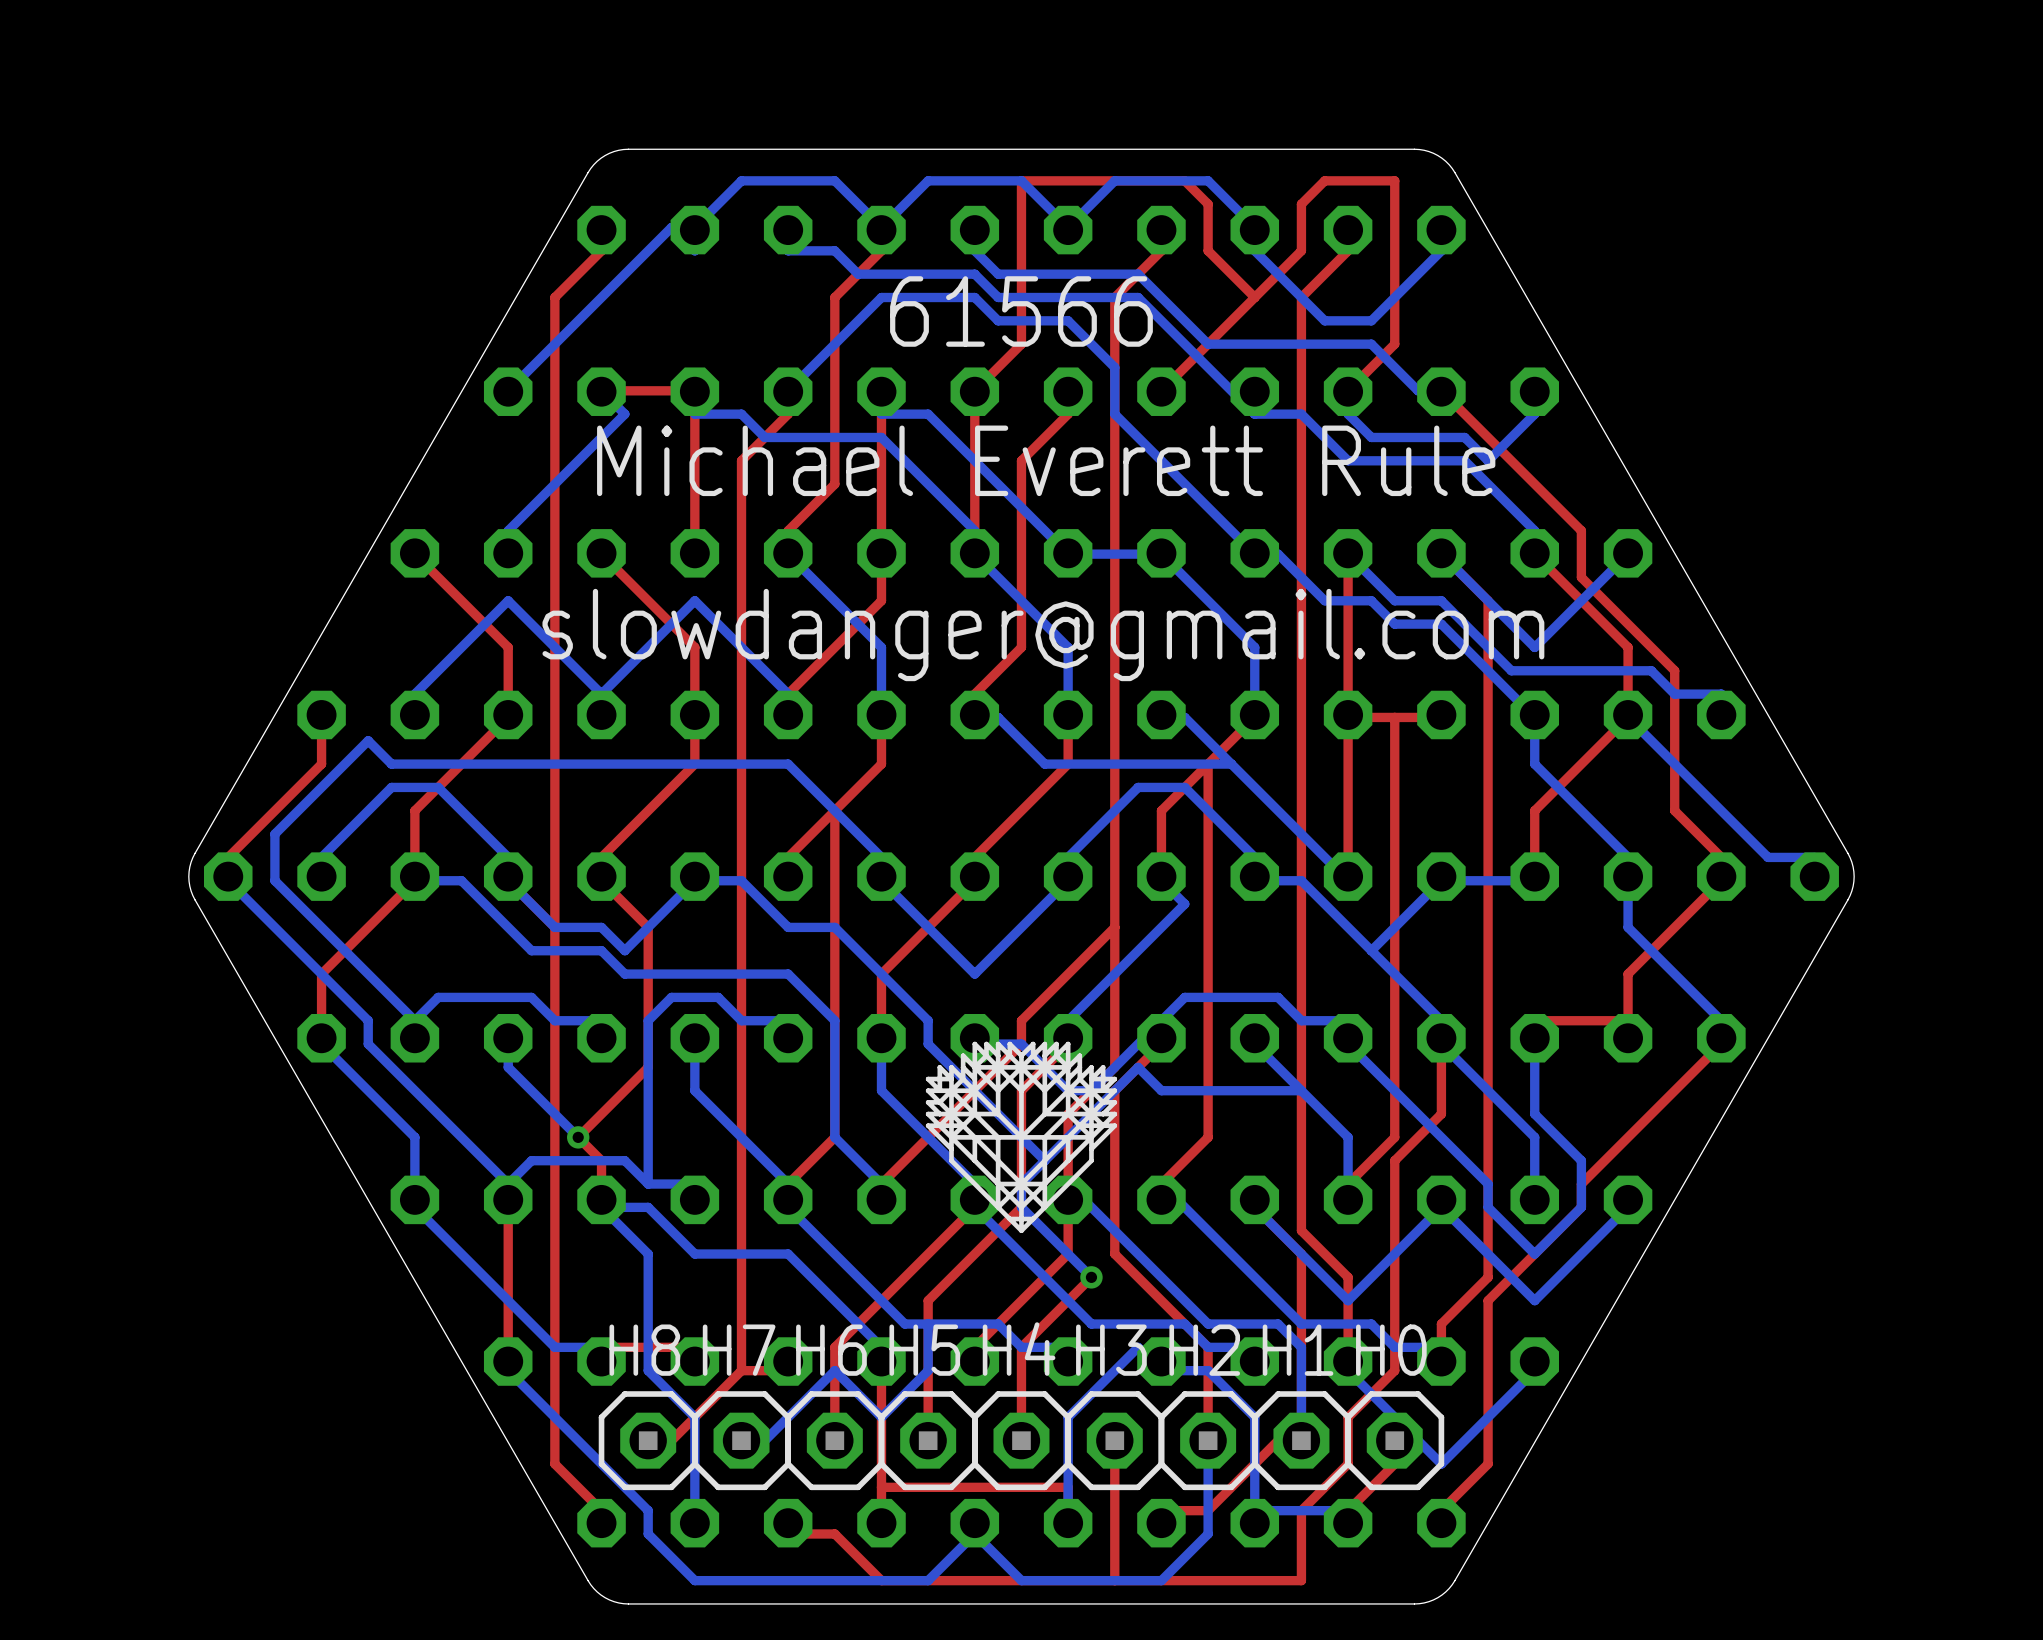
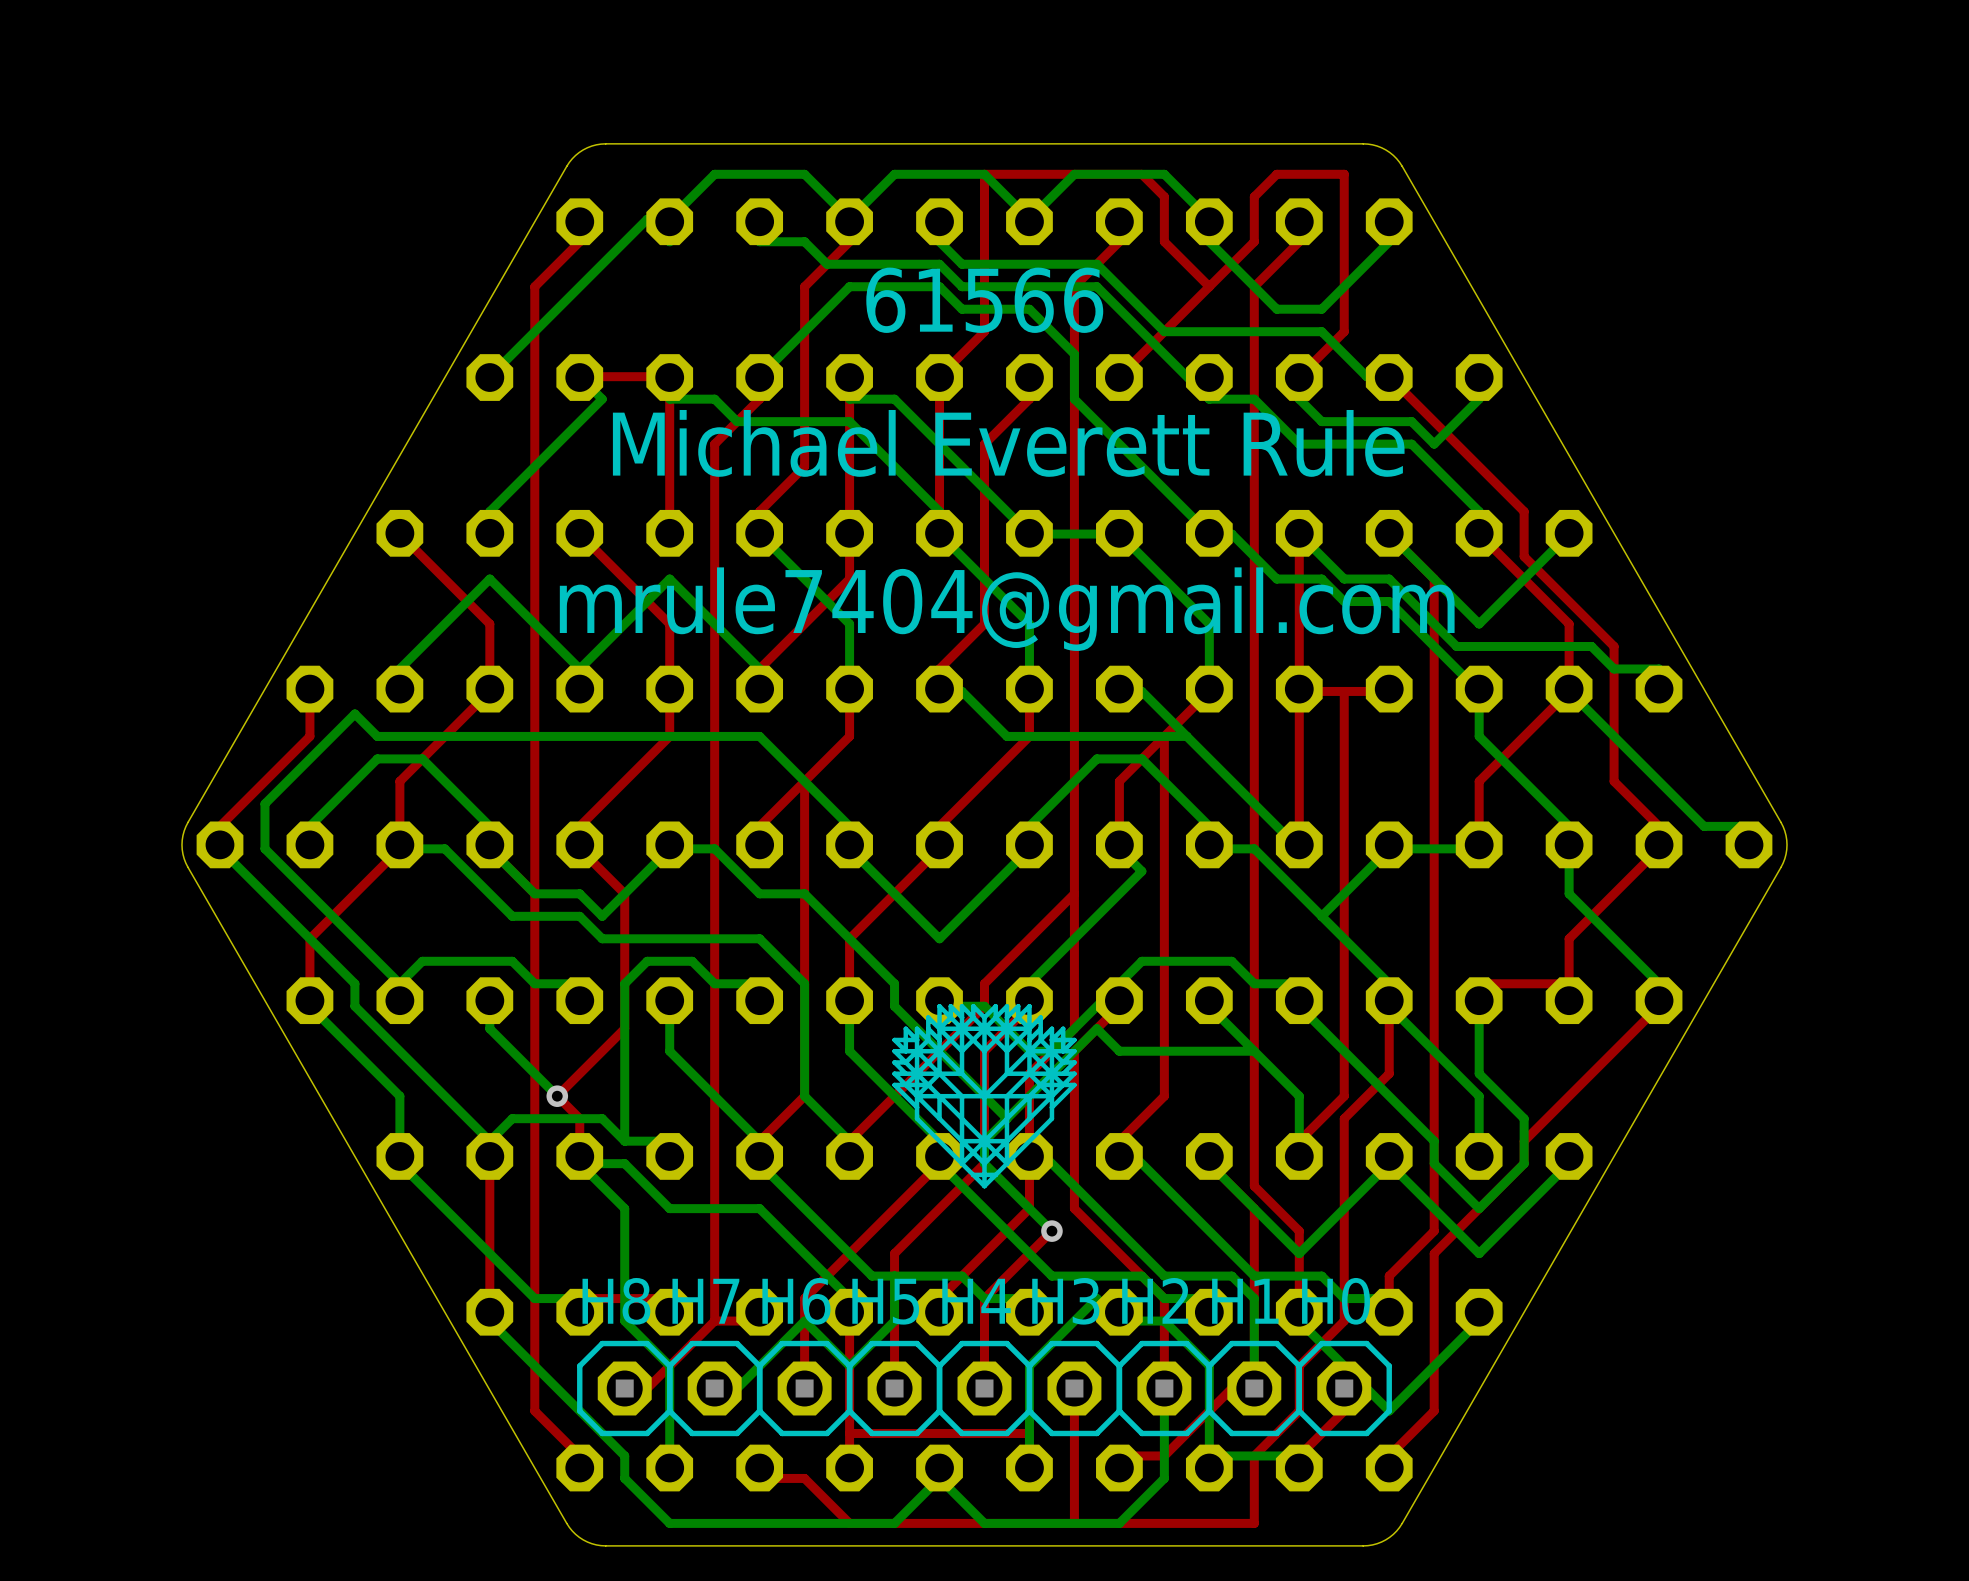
text: slowdanger@gmail.com (1043, 635) -> mrule7404@gmail.com (1007, 609)

